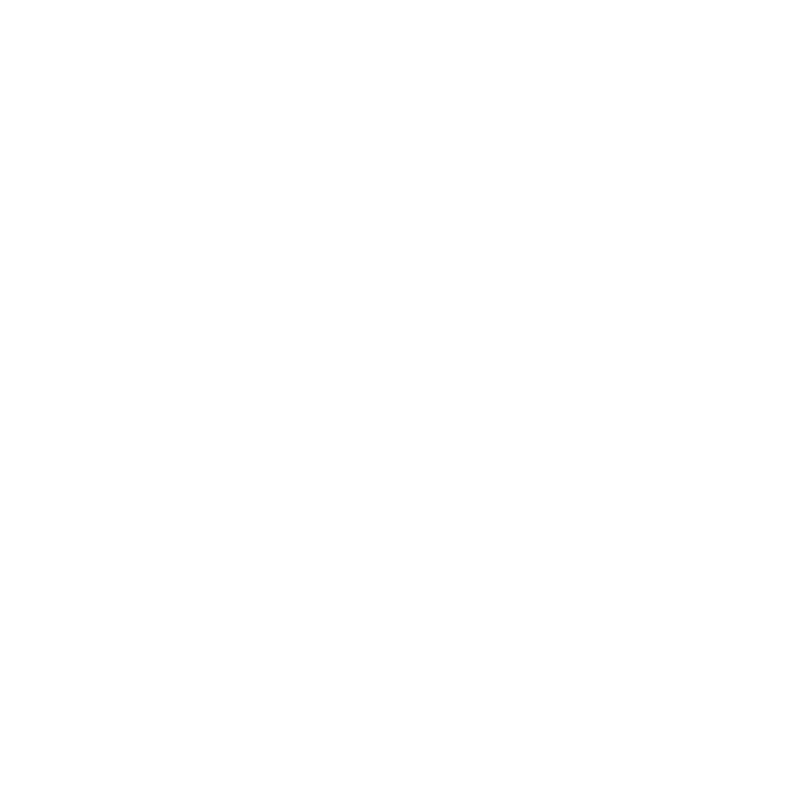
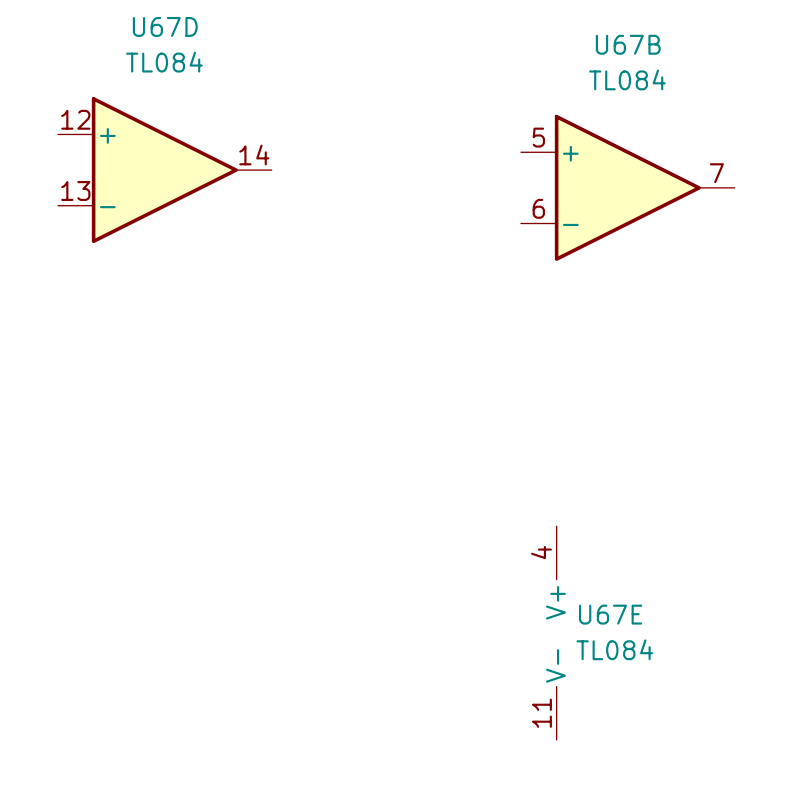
U67D: none -> TL084 (164, 170)
U67B: none -> TL084 (627, 187)
U67E: none -> TL084 (556, 633)

